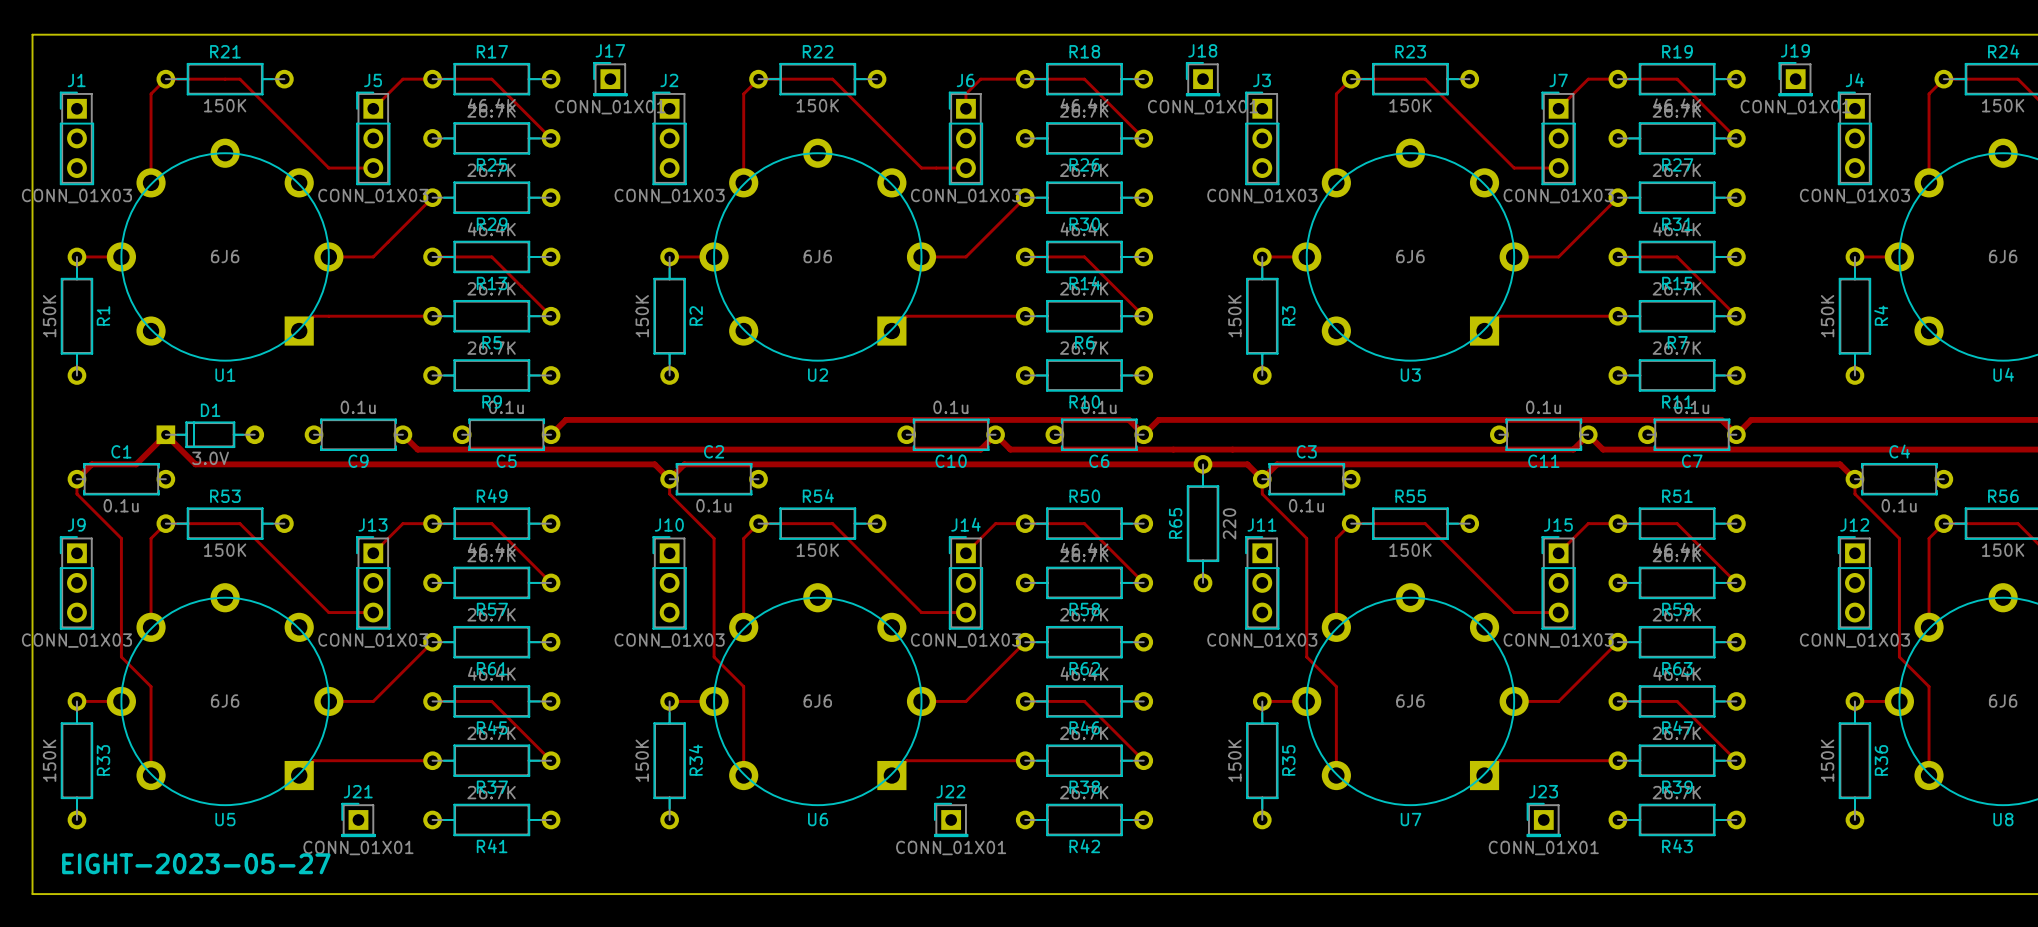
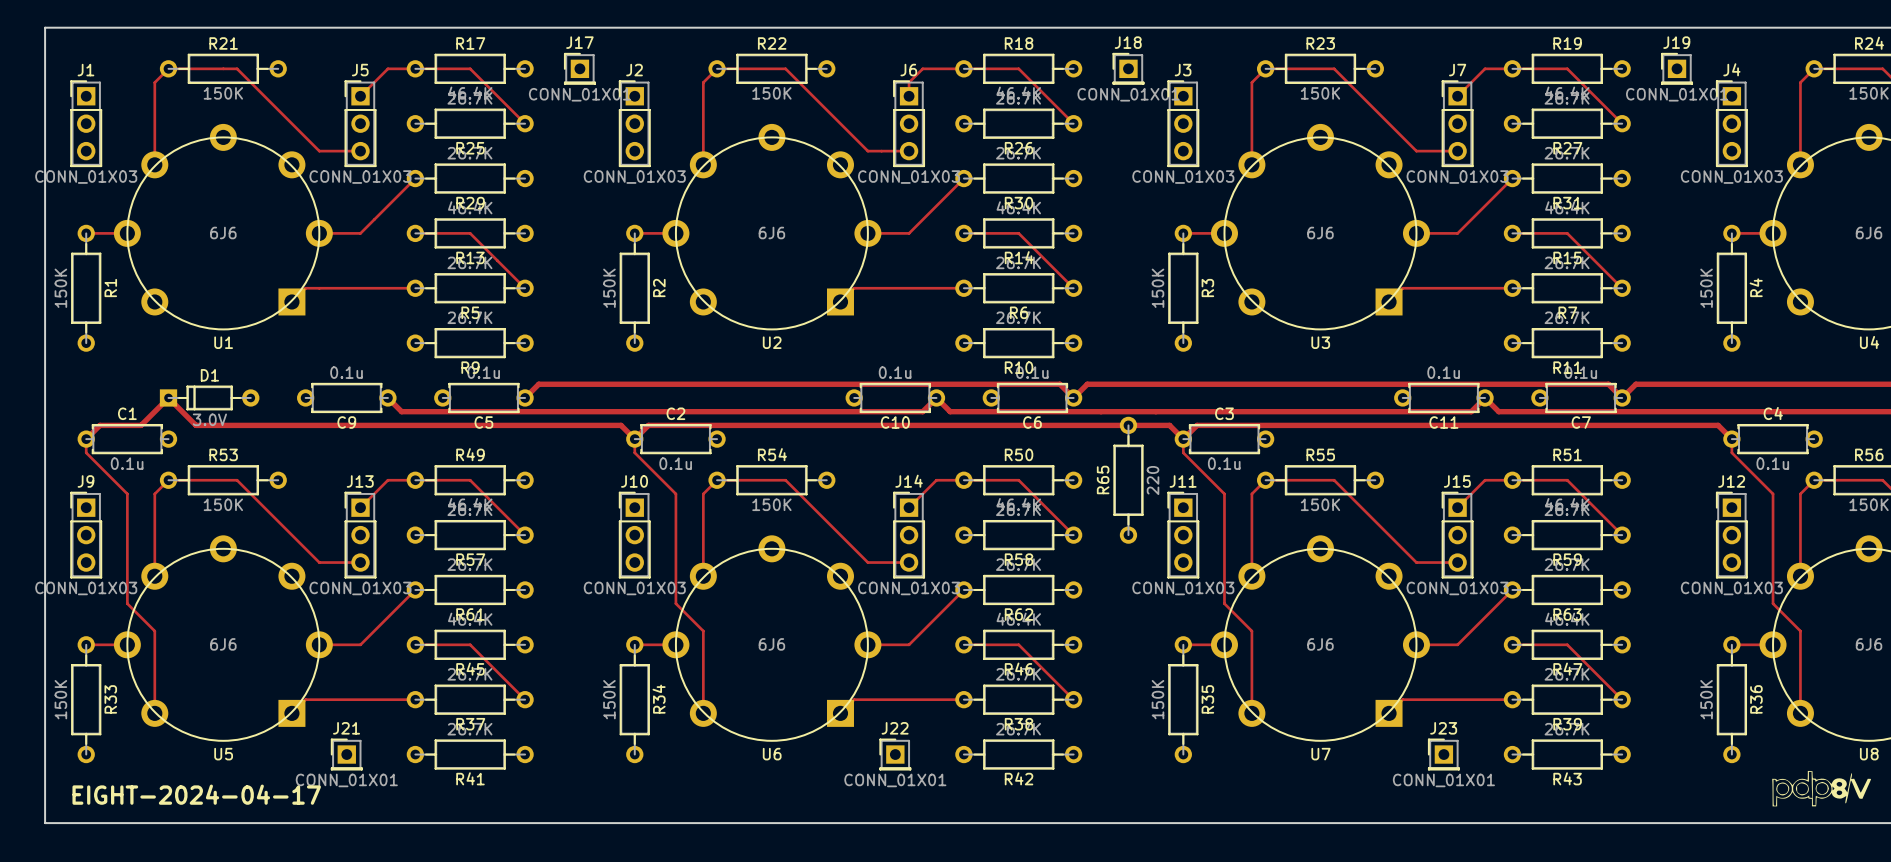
drawing: none -> [1772, 770, 1872, 807]
text: EIGHT-2023-05-27 (196, 863) -> EIGHT-2024-04-17 (196, 794)

